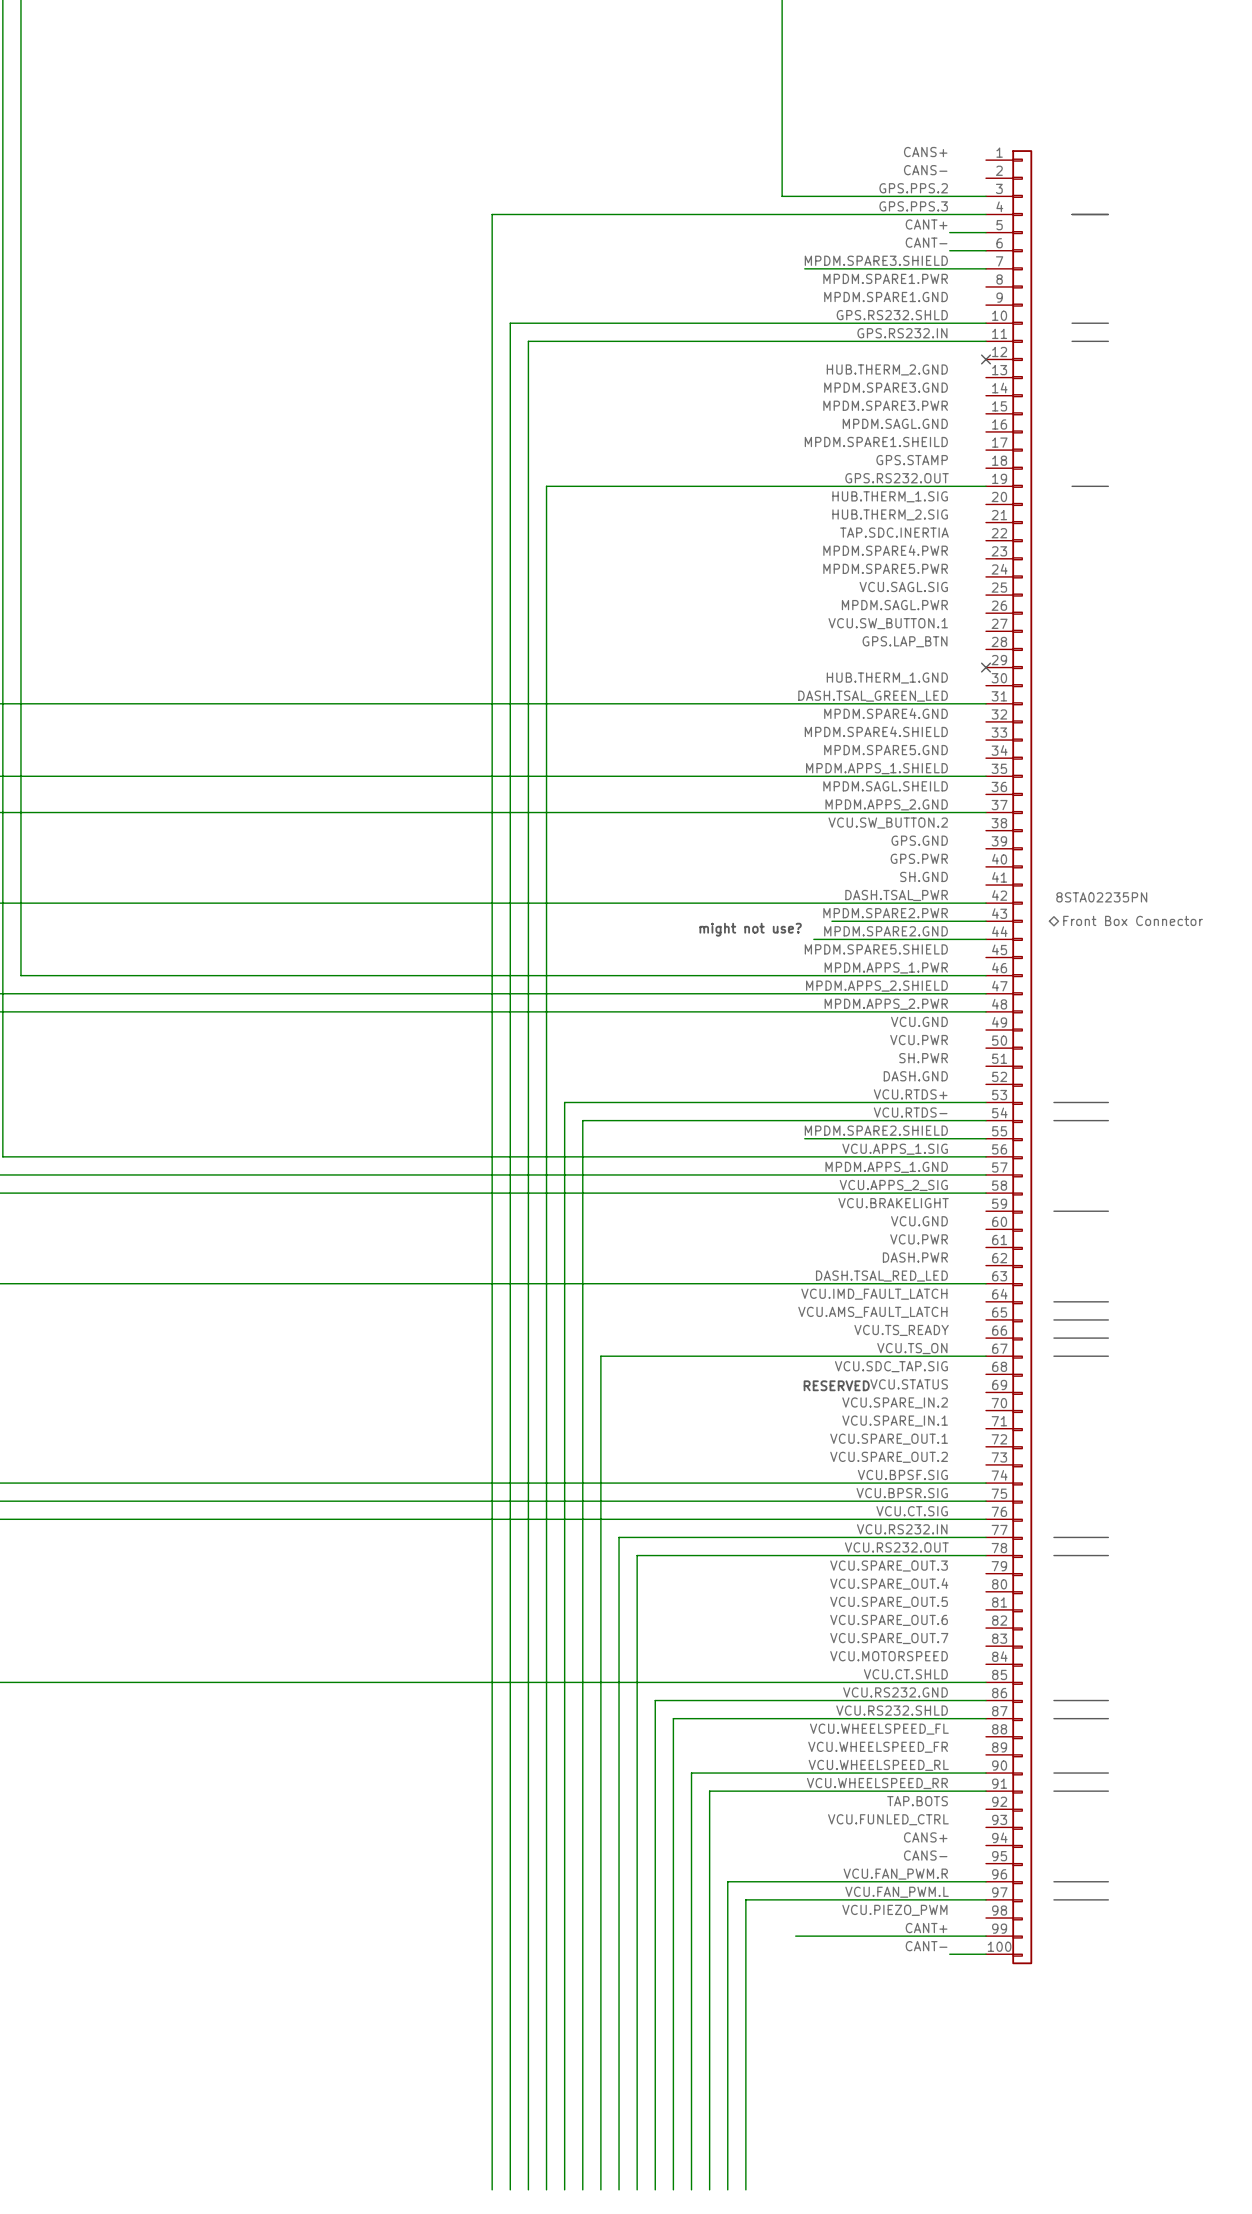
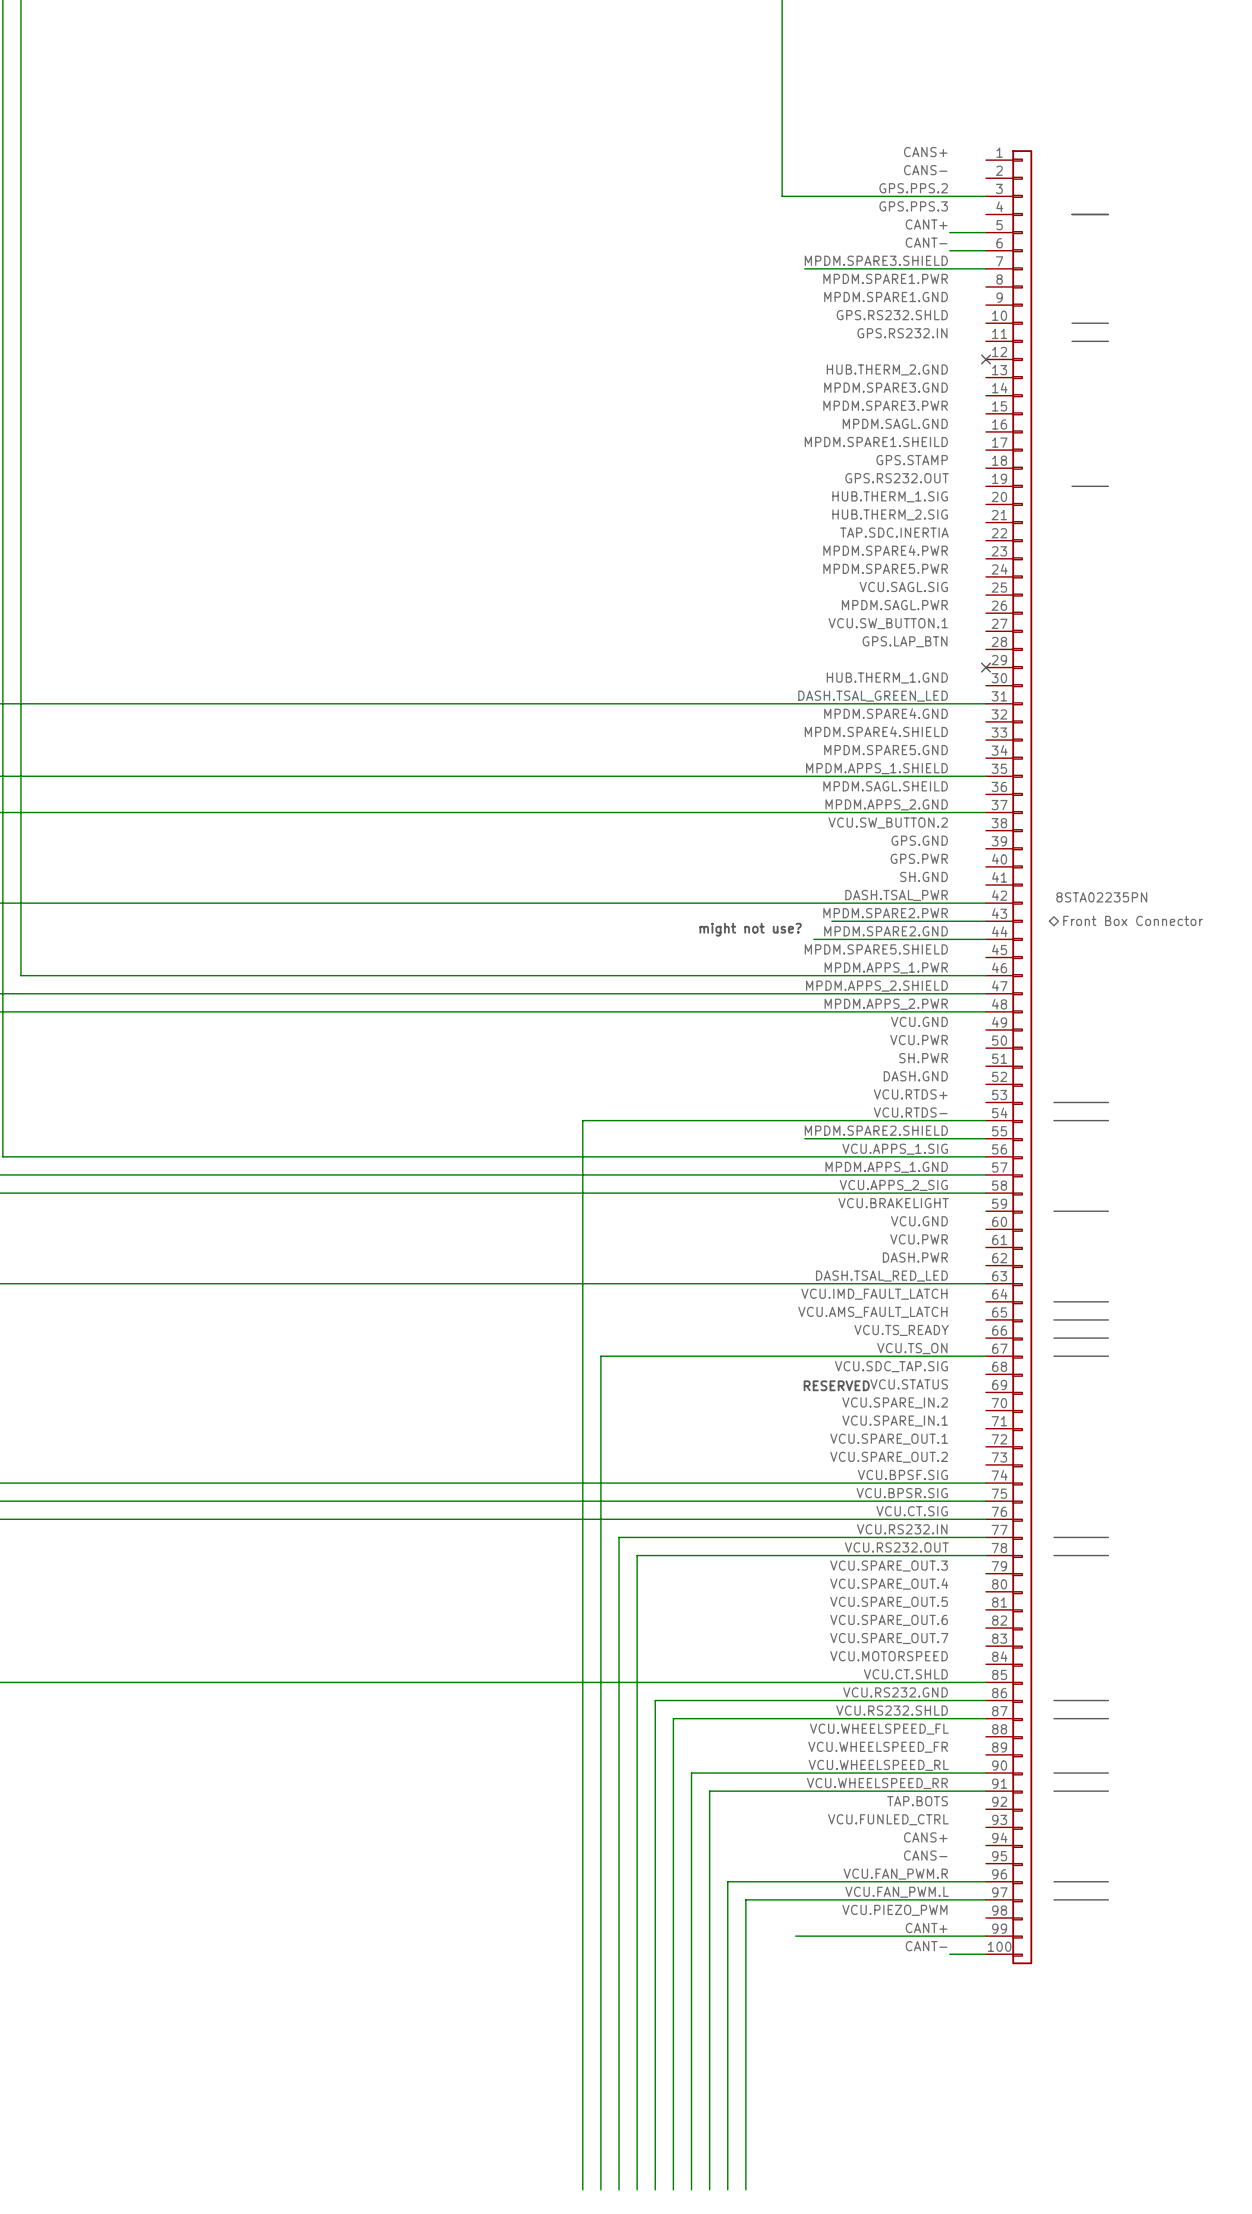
wire: (986, 214) (492, 214) (492, 2189) -> none
wire: (986, 323) (510, 323) (510, 2189) -> none
wire: (986, 341) (528, 341) (528, 2189) -> none
wire: (986, 486) (546, 486) (546, 2189) -> none
wire: (986, 1102) (564, 1102) (564, 2189) -> none

